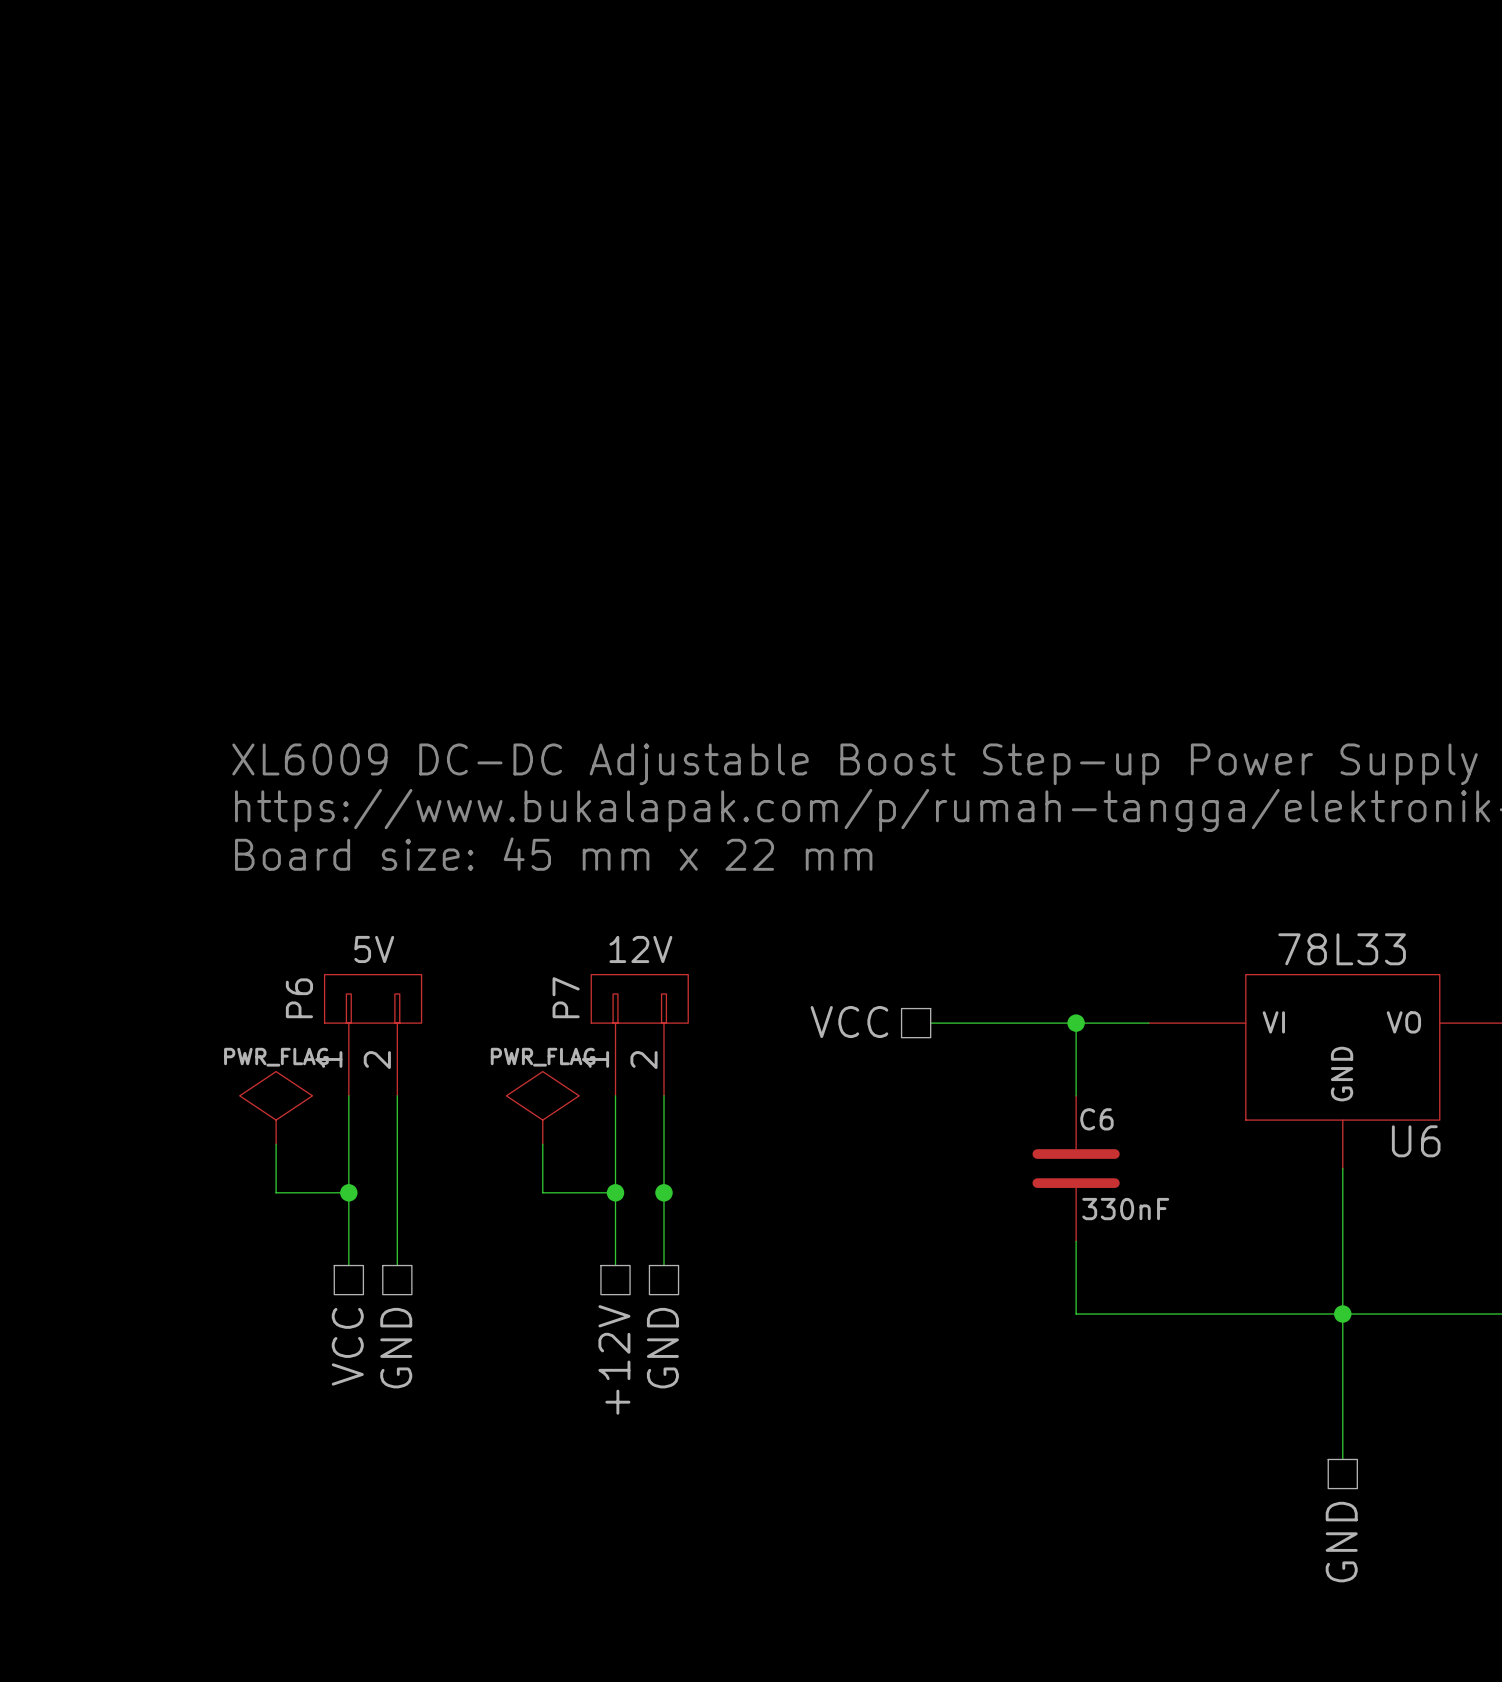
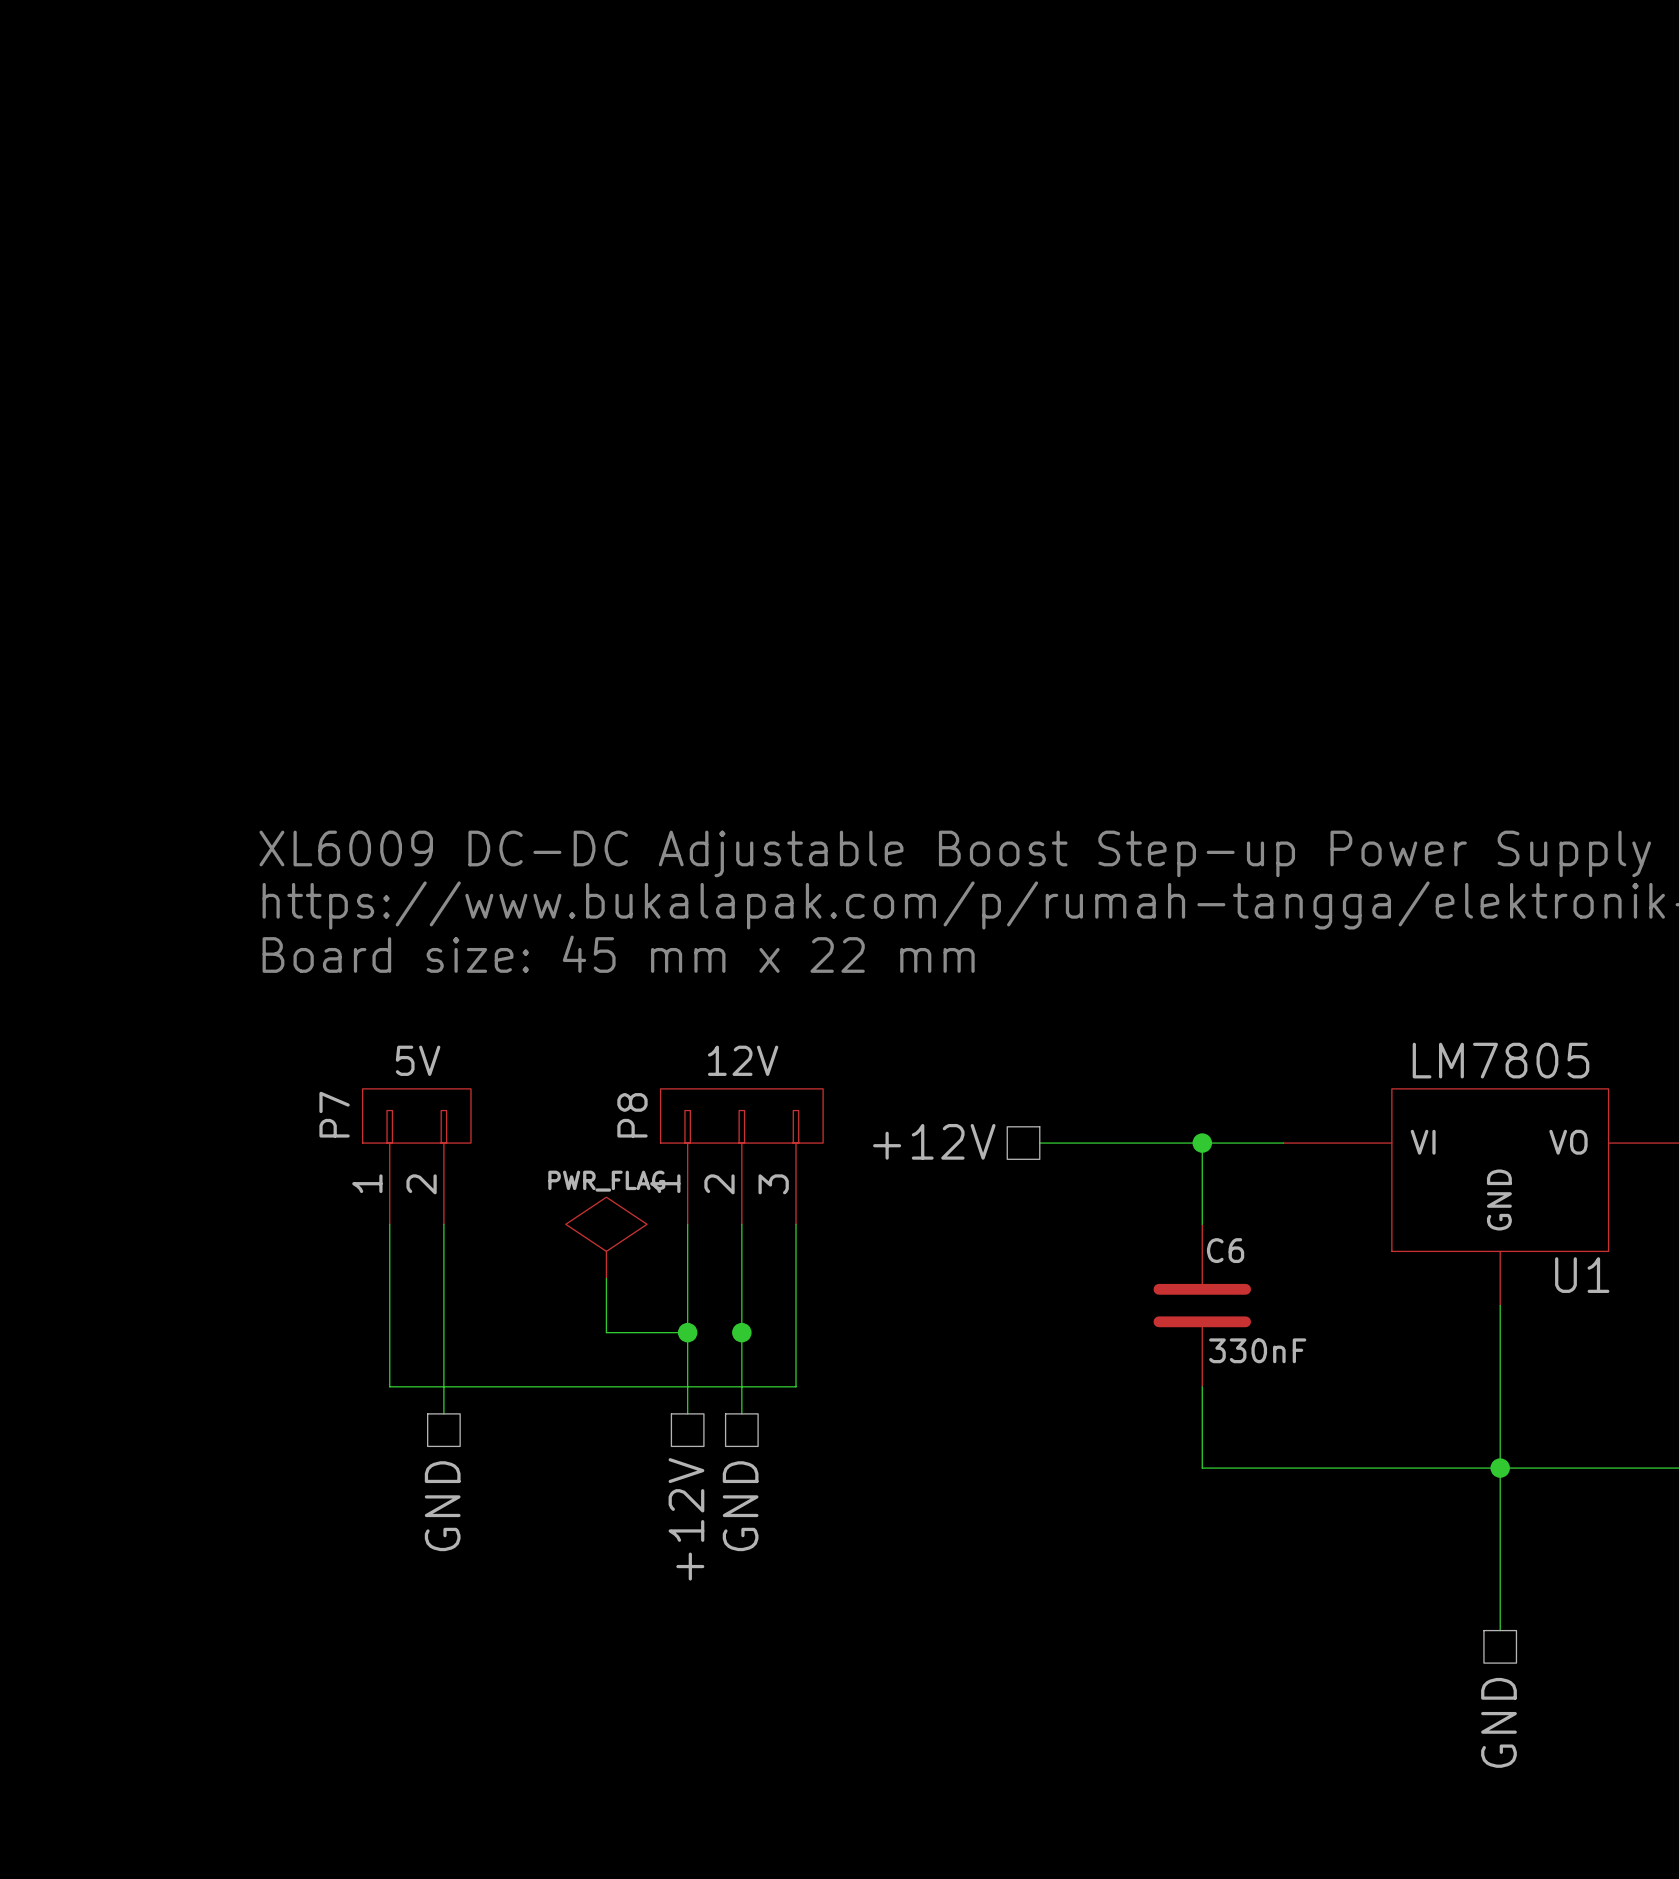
U6 value: 78L33 (1342, 949) -> LM7805 (1500, 1060)
P6 name: P6 (299, 998) -> P7 (334, 1114)
hierarchical label: VCC (849, 1022) -> +12V (934, 1141)
P7: 12V (639, 1035) -> none
P8: none -> 12V (741, 1156)
power symbol: PWR_FLAG (276, 1107) -> none
U6 name: U6 (1416, 1141) -> U1 (1582, 1275)
wire: (276, 1144) (276, 1192) (348, 1192) -> none
junction: (348, 1192) -> none
wire: (348, 1241) (348, 1265) -> (389, 1386) (796, 1386) (796, 1224)
hierarchical label: VCC (347, 1346) -> none

